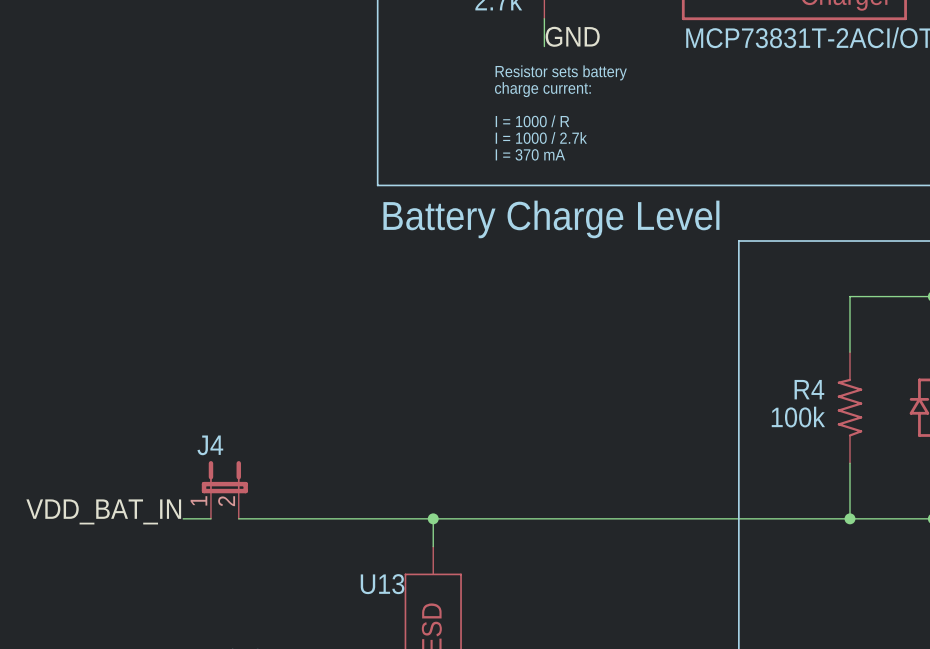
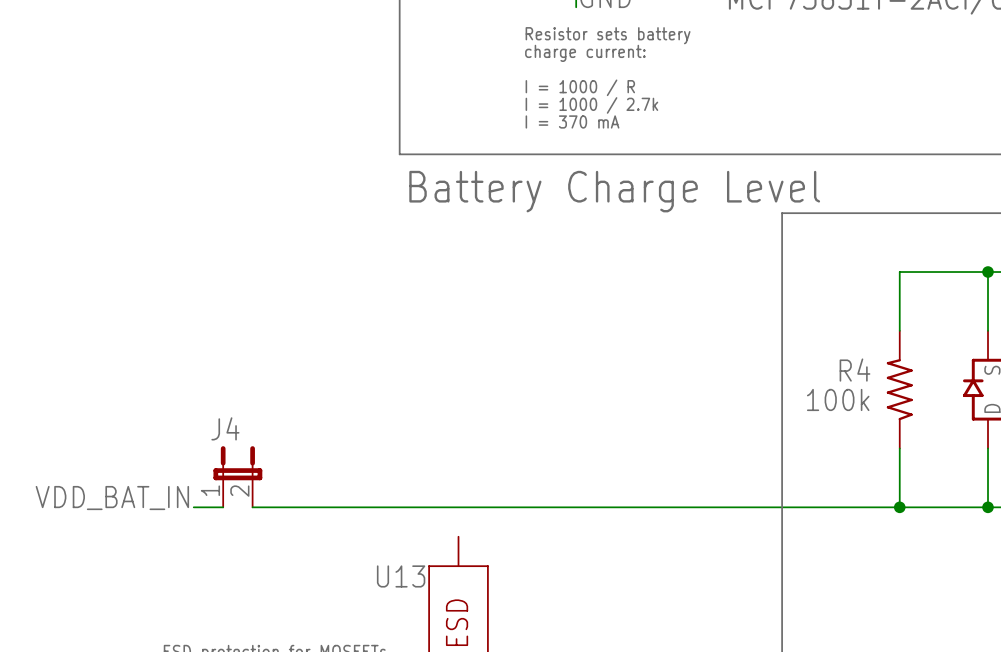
wire: (433, 518) (433, 546) -> none
junction: (433, 518) -> none

